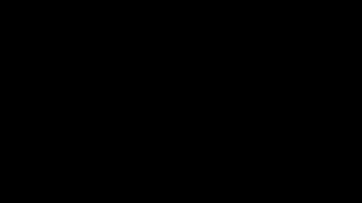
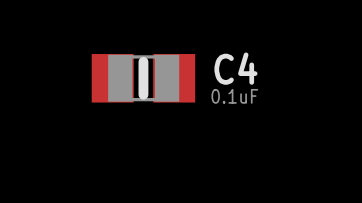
C4: none -> 0.1uF (143, 78)

